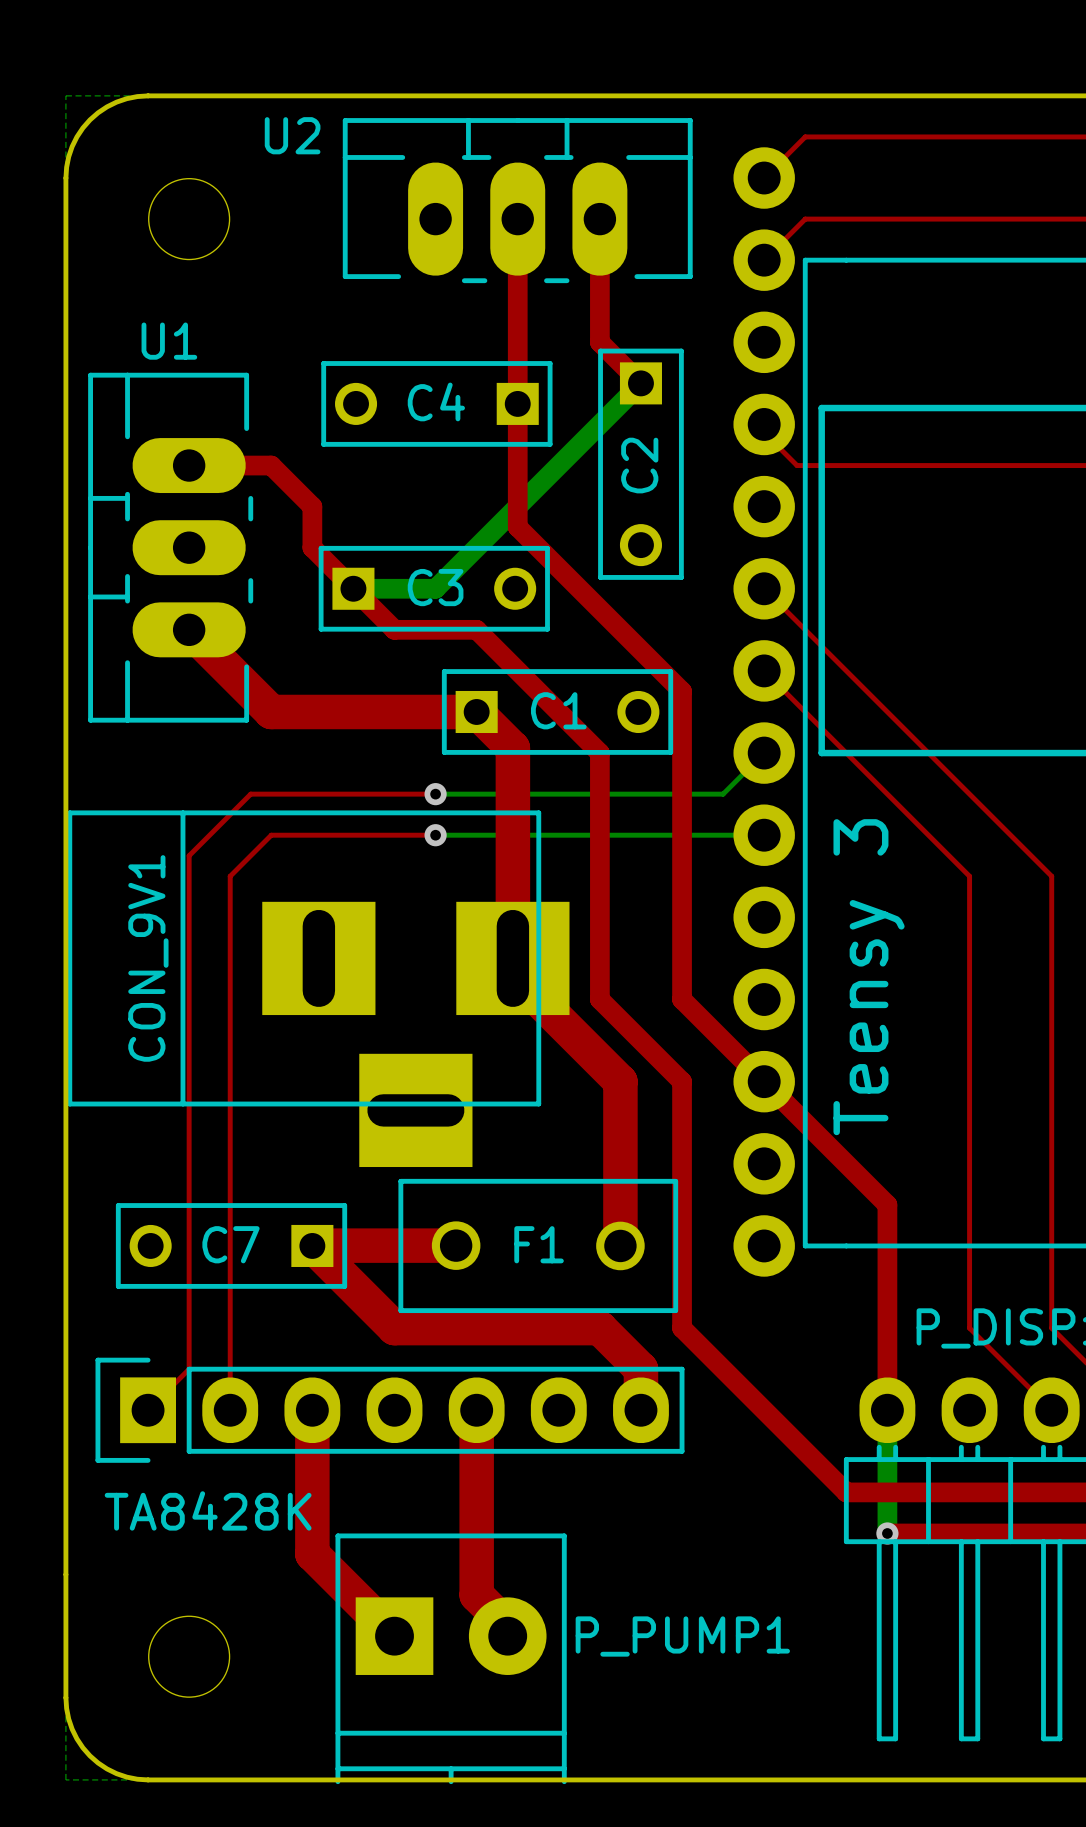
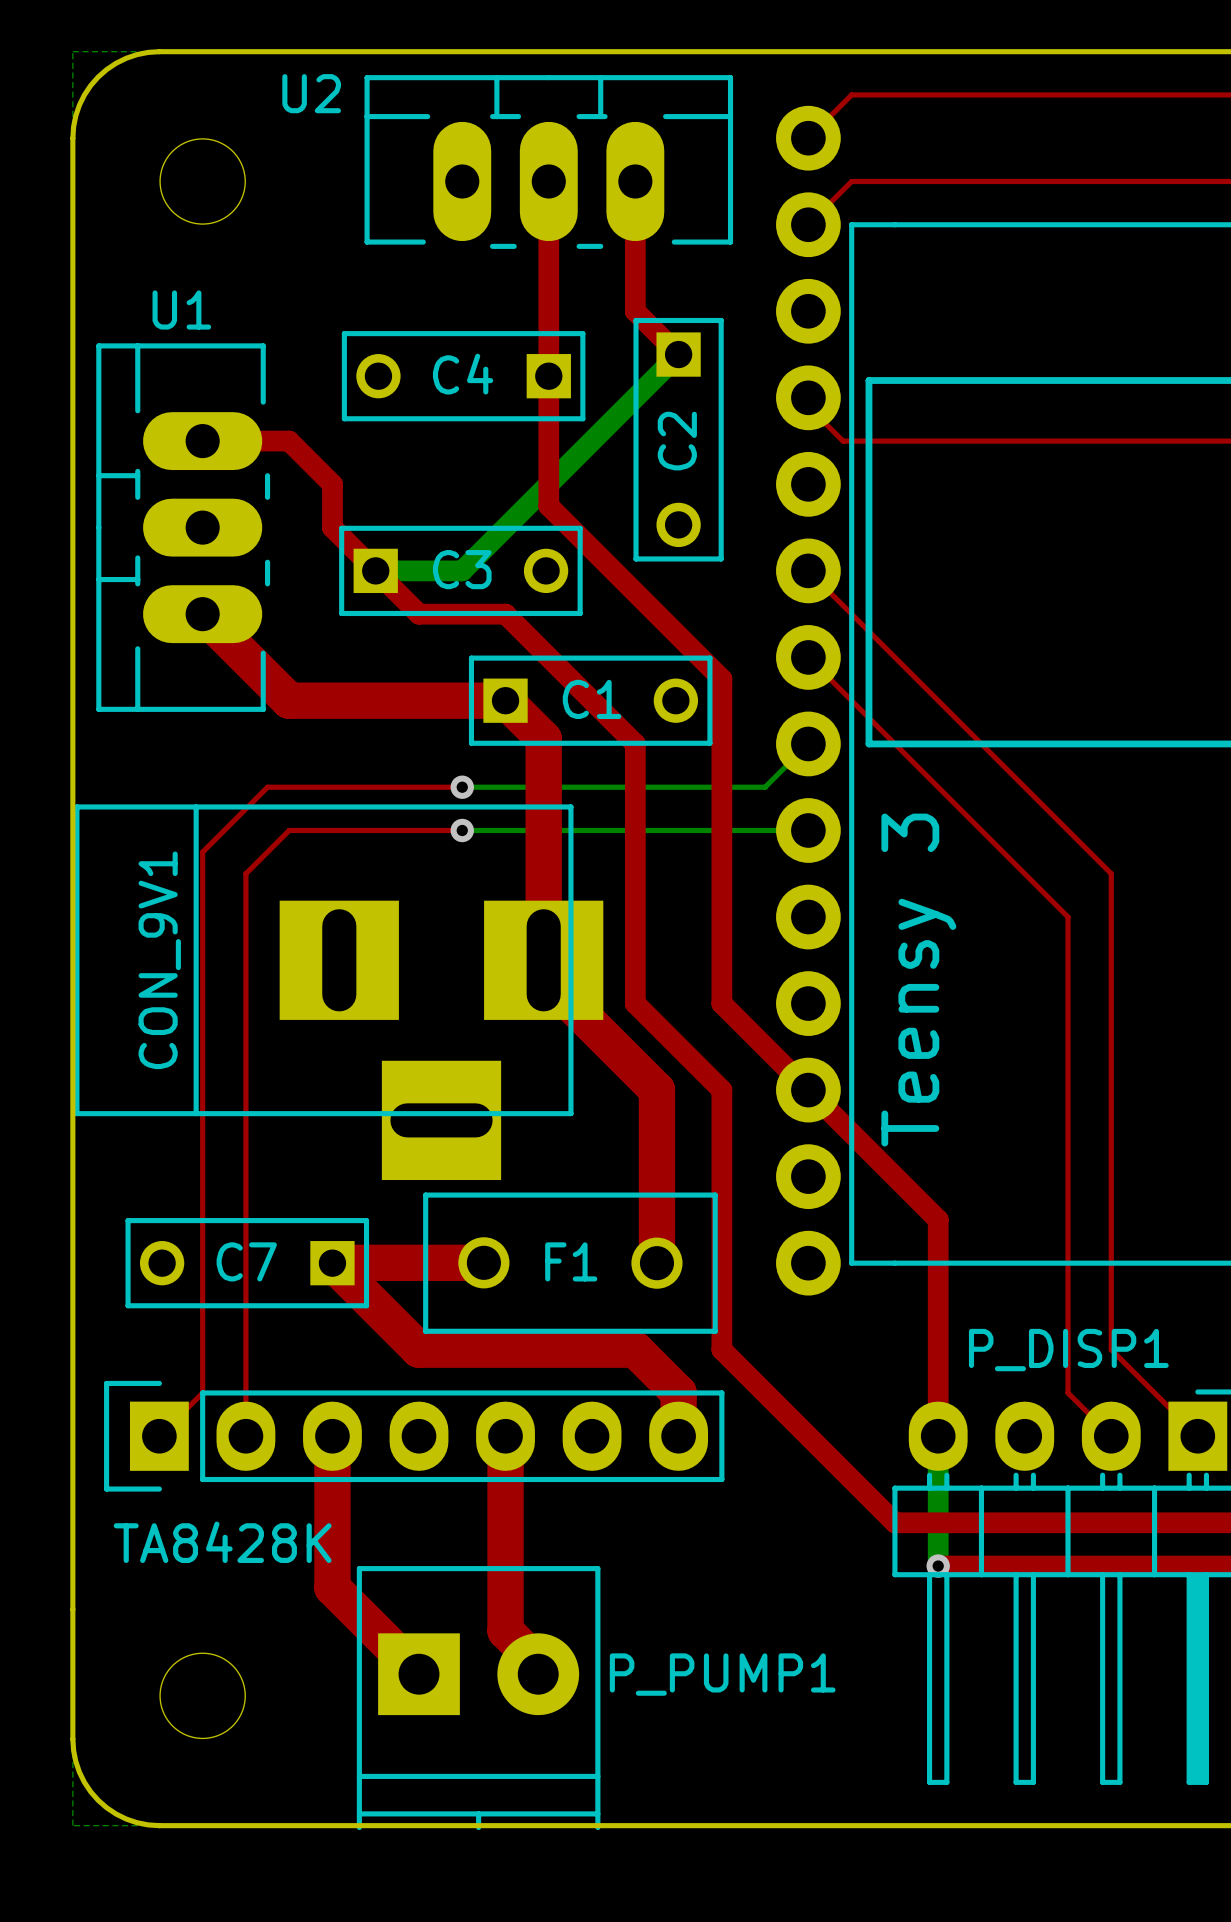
top track: (969, 876) (969, 1328) (1010, 1369) -> (1024, 873) (1068, 917) (1068, 1392)

